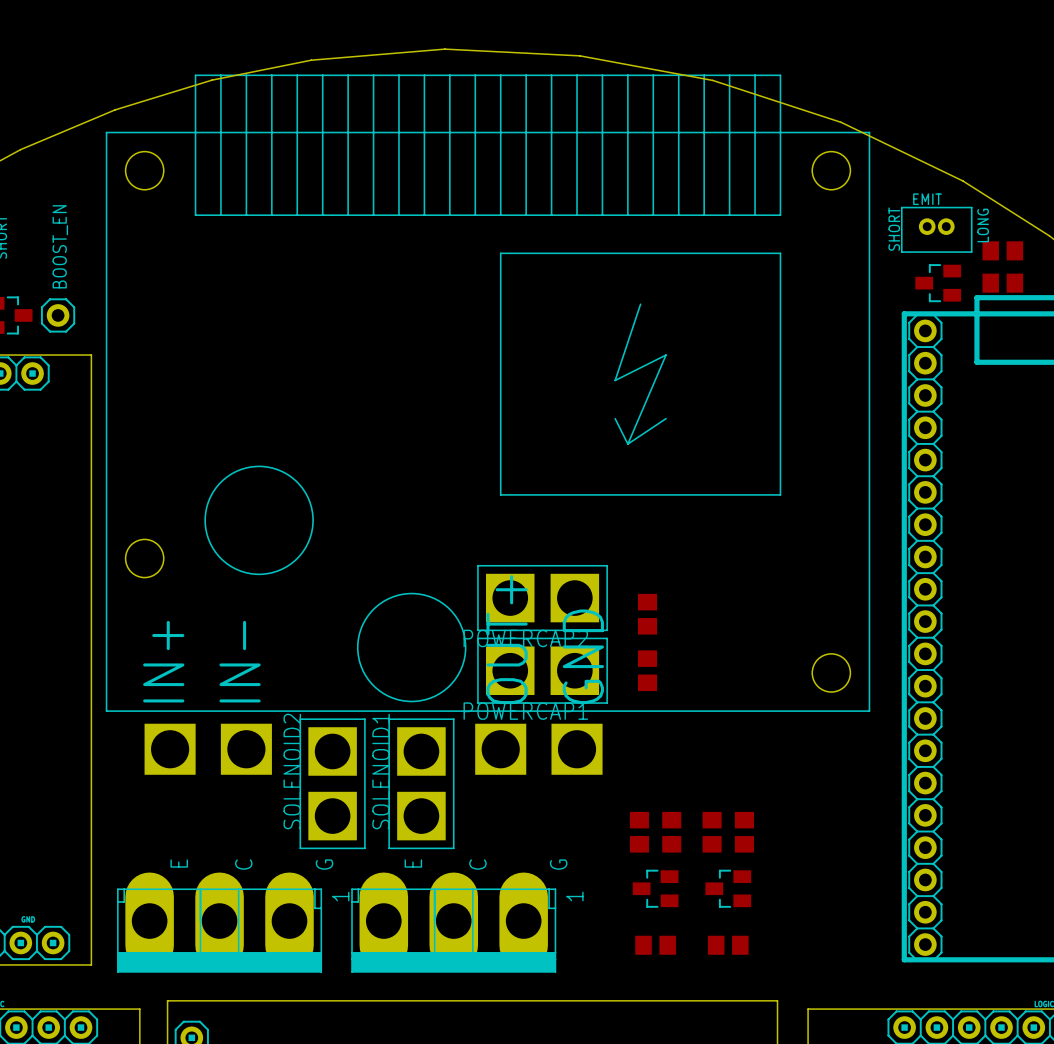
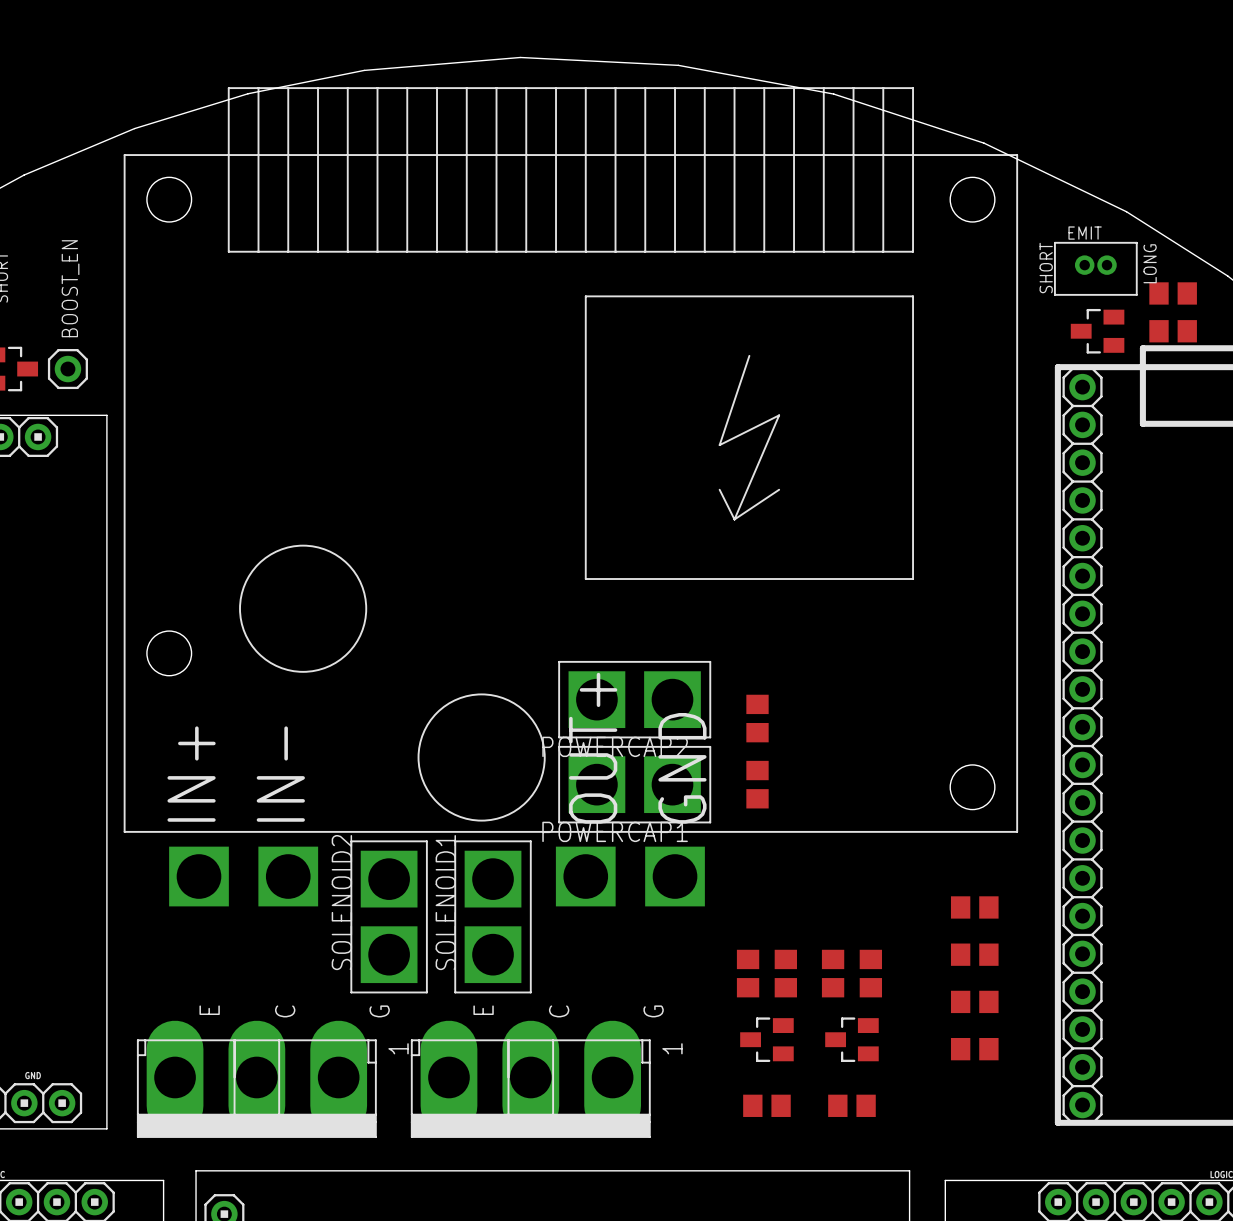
part: none -> (974, 907)
part: none -> (974, 954)
part: none -> (974, 1001)
part: none -> (974, 1049)

